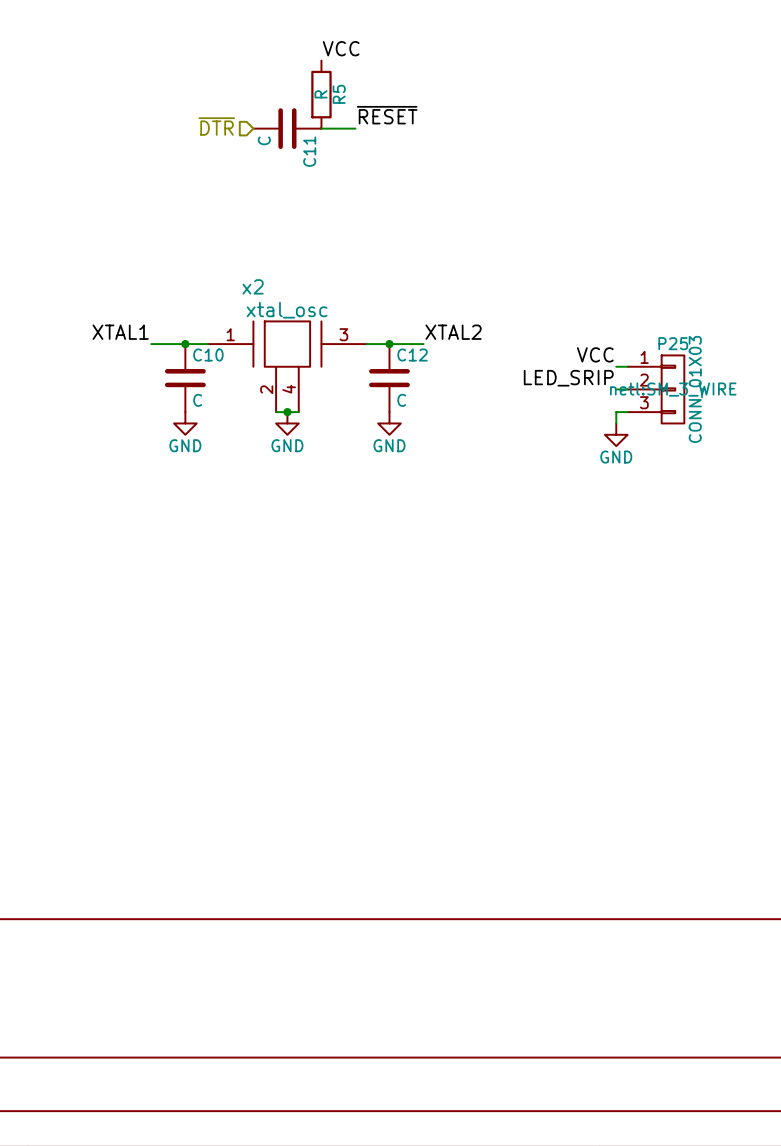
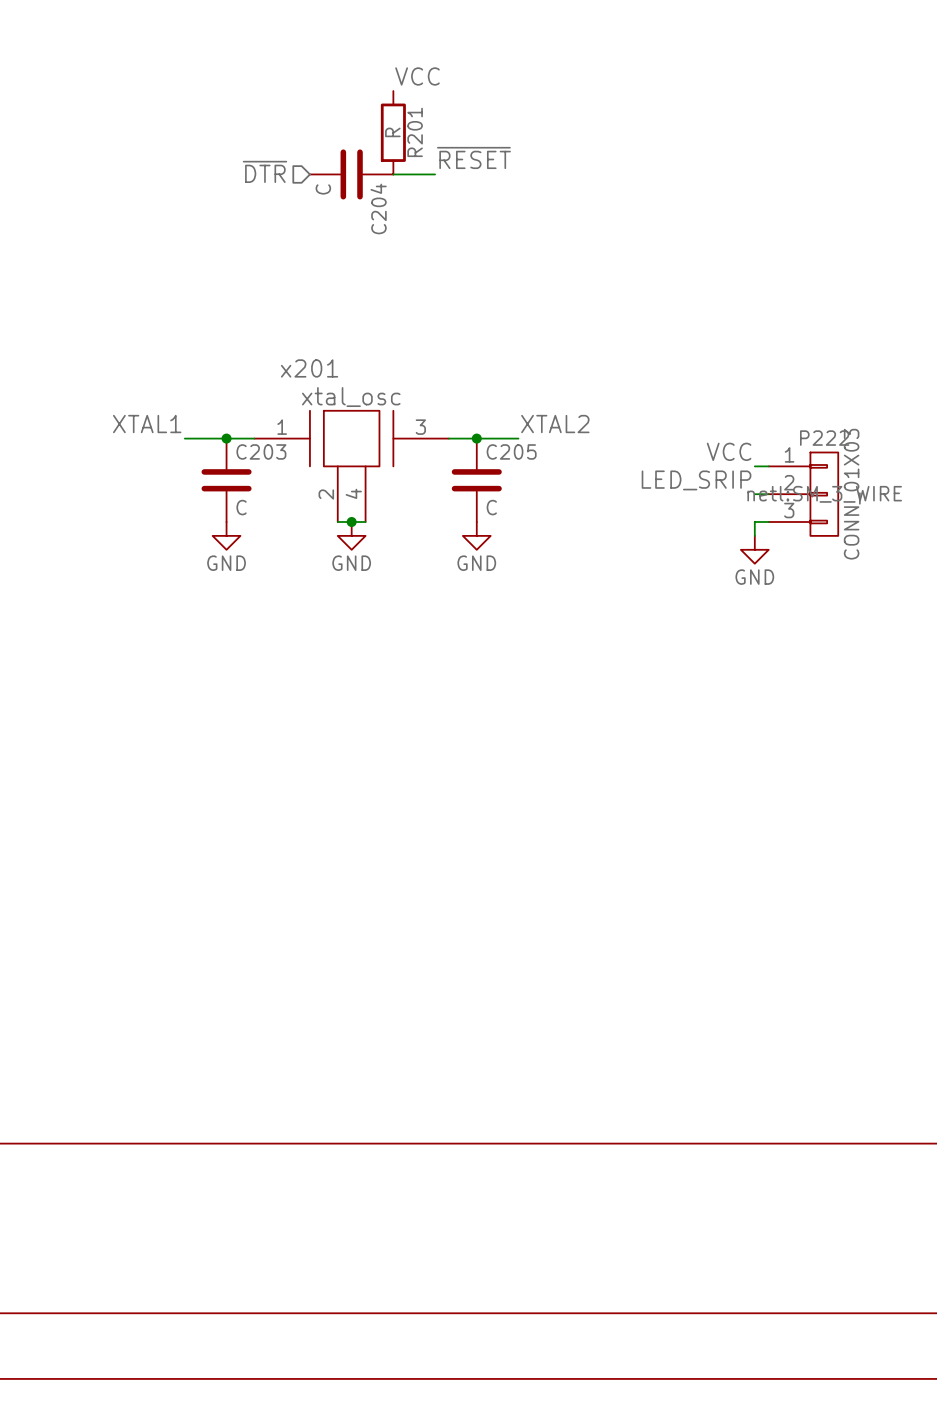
R5 name: R5 (339, 94) -> R201 (415, 132)
C11 name: C11 (309, 151) -> C204 (378, 208)
x2 name: x2 (253, 286) -> x201 (309, 368)
P25 name: P25 (673, 343) -> P222 (824, 438)
C10 name: C10 (208, 354) -> C203 (261, 451)
C12 name: C12 (412, 354) -> C205 (511, 451)

